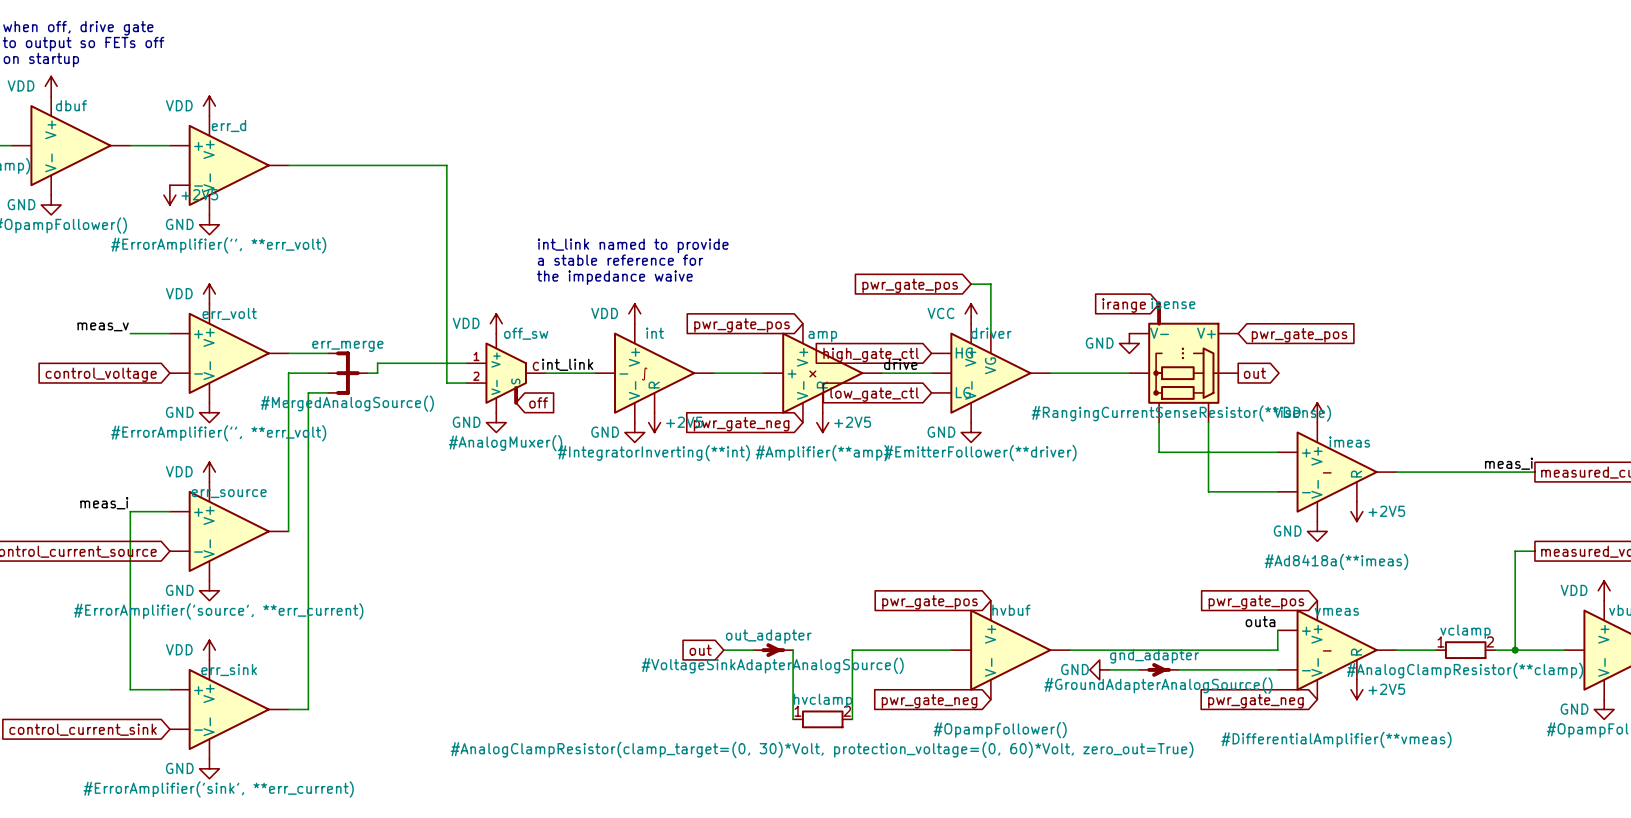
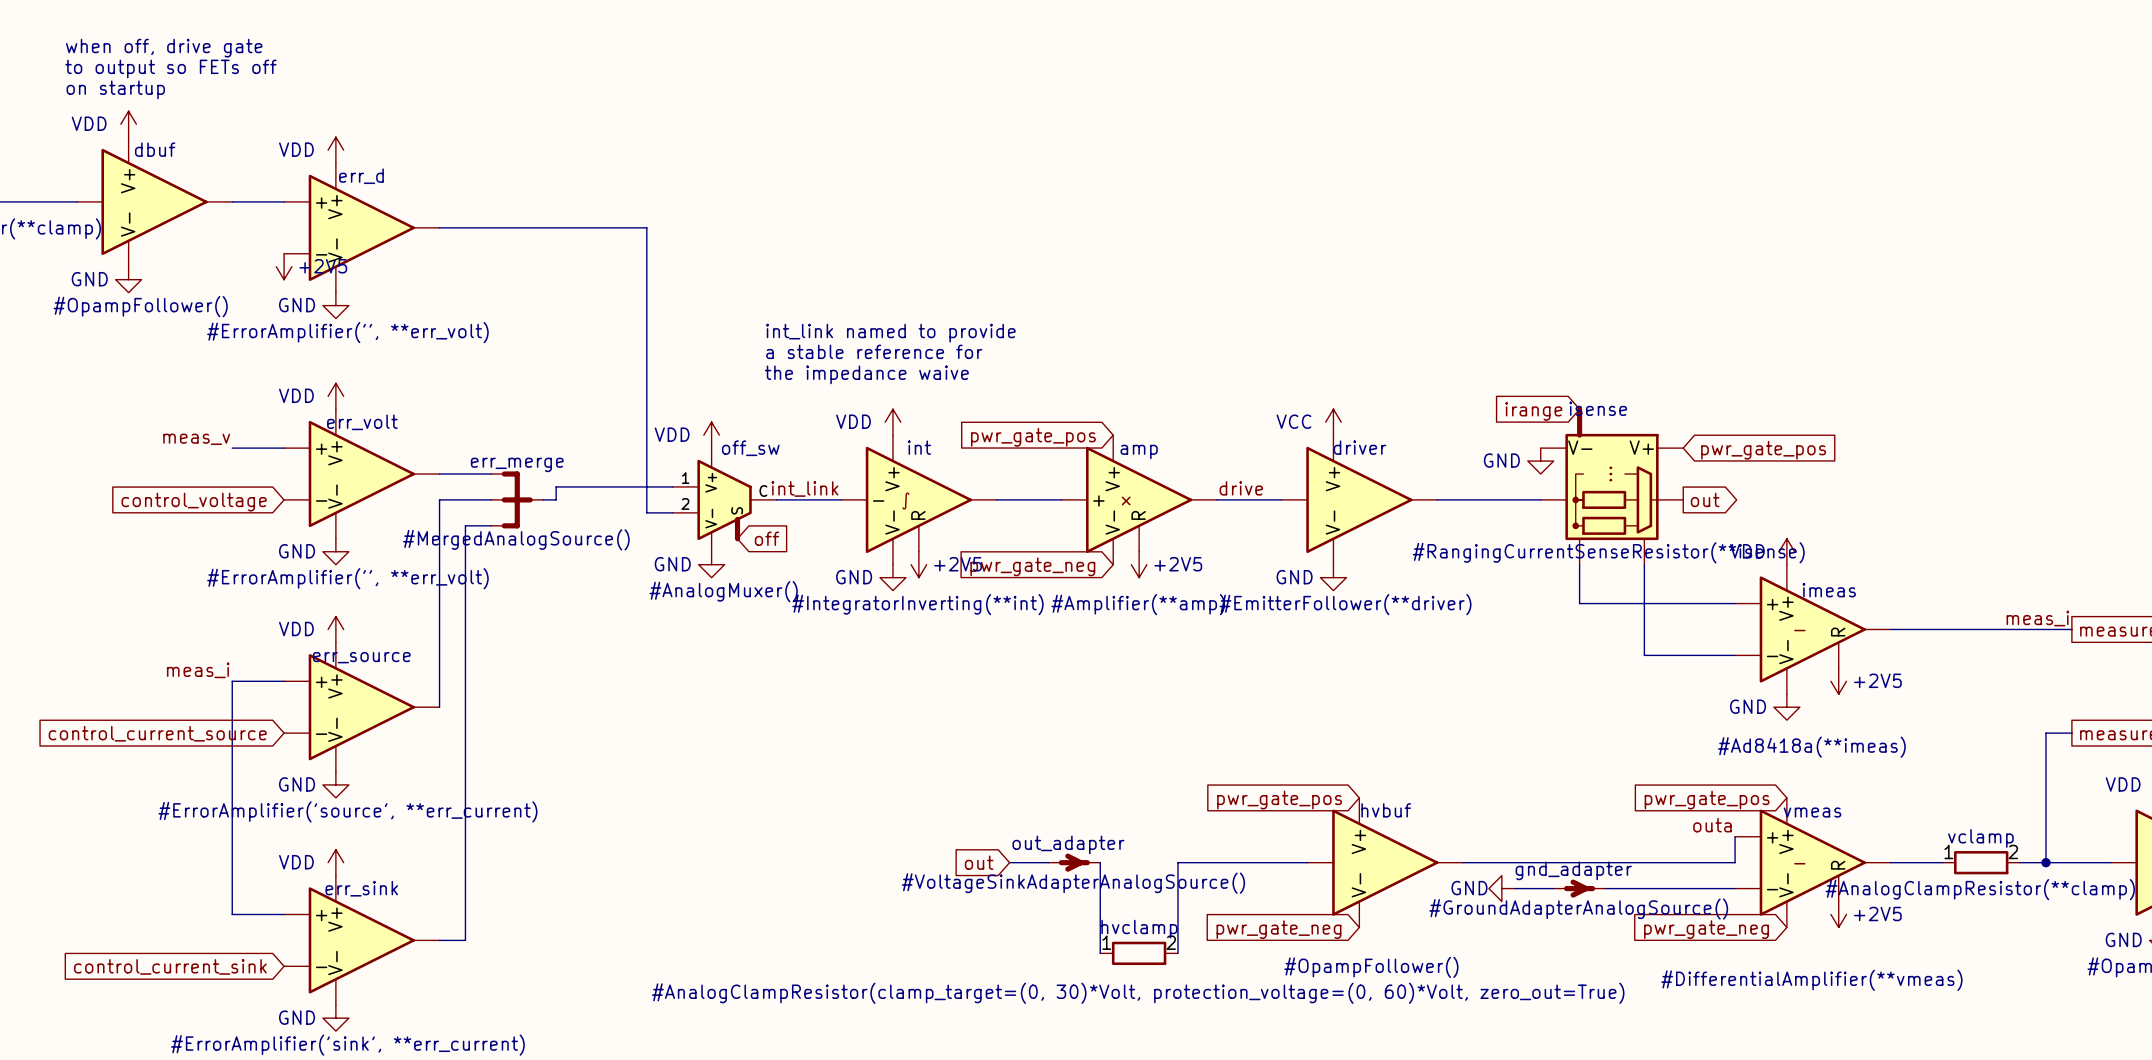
wire: (971, 284) (990, 284) (990, 333) -> none
global label: pwr_gate_pos (910, 285) -> none
driver symbol: [931, 323, 1051, 423] -> [1281, 435, 1438, 565]
global label: high_gate_ctl (871, 355) -> none
global label: low_gate_ctl (874, 394) -> none

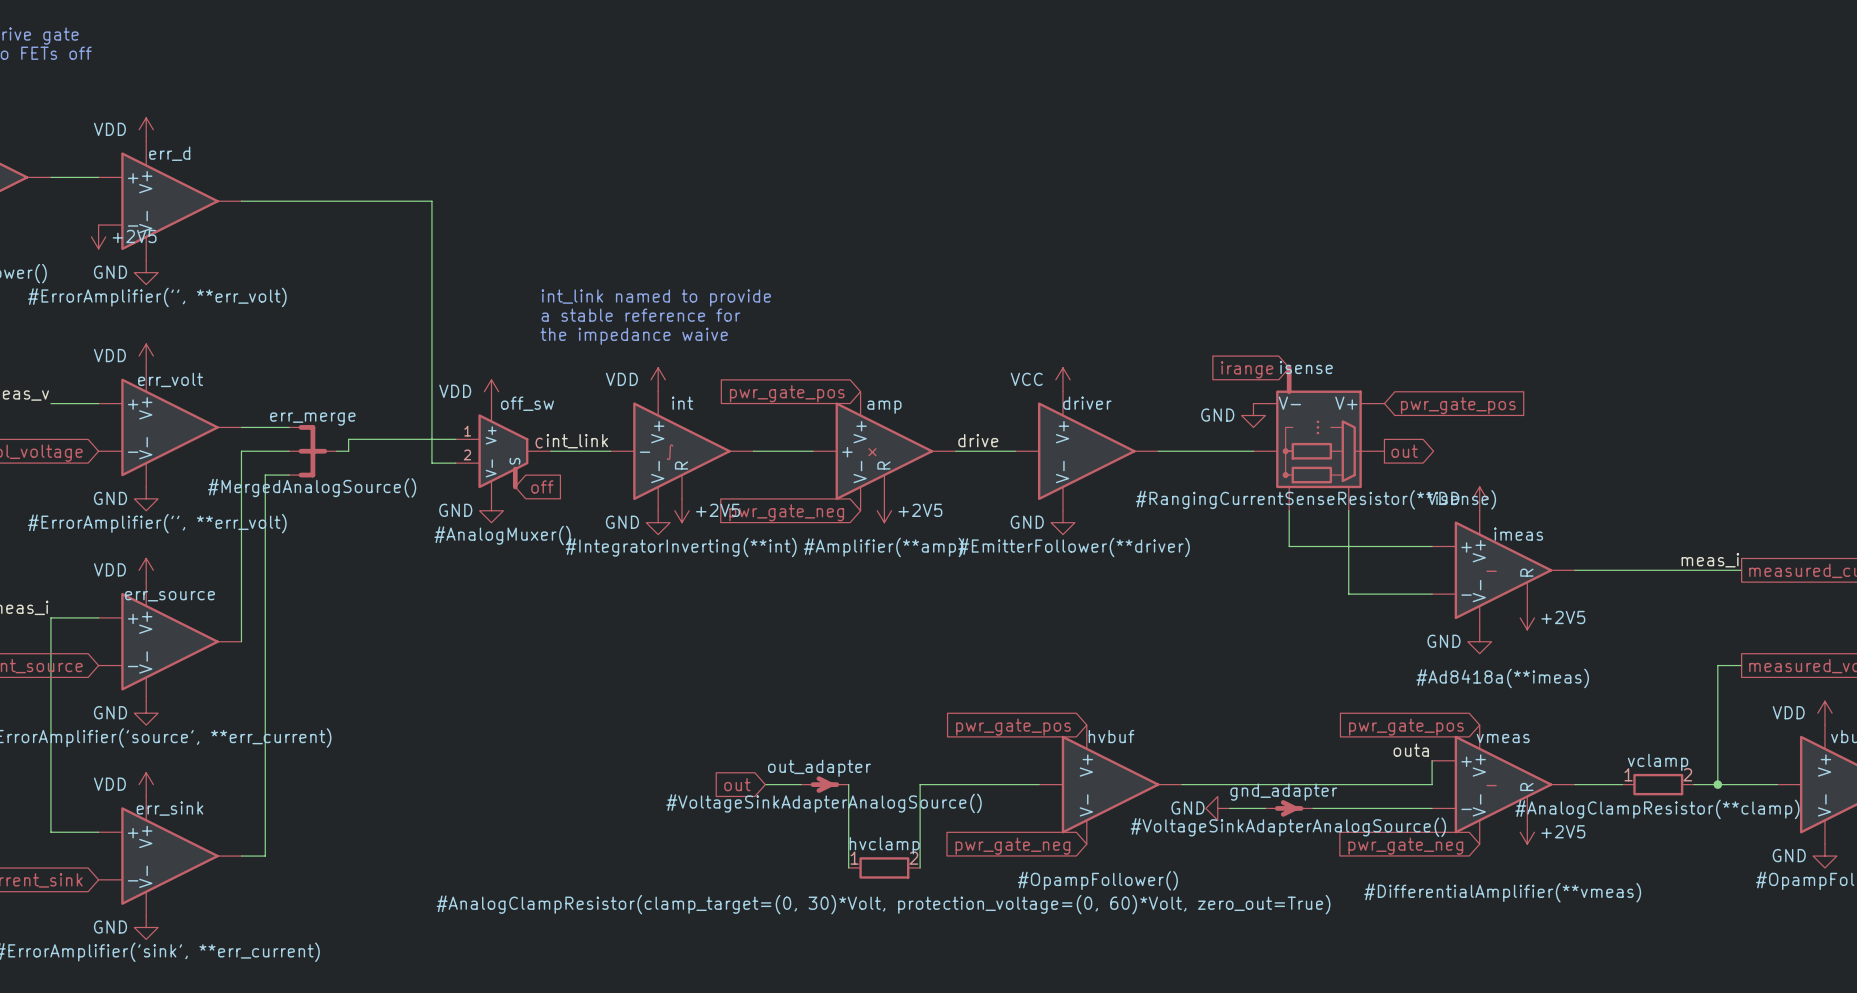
gnd_adapter value: #GroundAdapterAnalogSource() (1578, 909) -> #VoltageSinkAdapterAnalogSource() (1288, 827)

